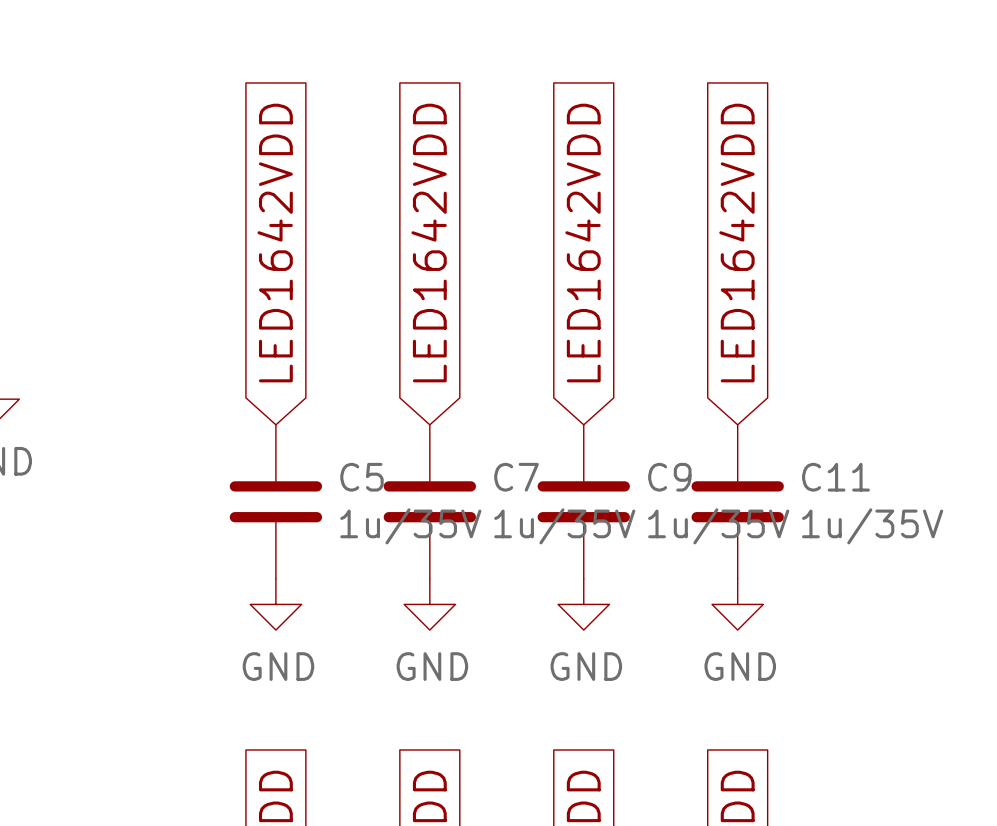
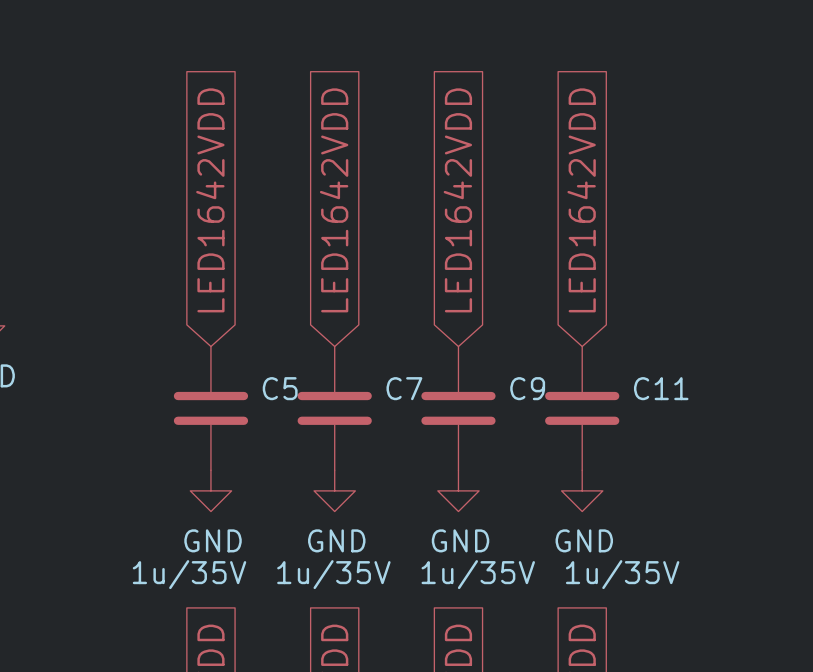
C5 value position: 1u/35V (410, 526) -> 1u/35V (189, 574)
C7 value position: 1u/35V (564, 526) -> 1u/35V (333, 574)
C9 value position: 1u/35V (718, 526) -> 1u/35V (478, 574)
C11 value position: 1u/35V (872, 526) -> 1u/35V (622, 574)

